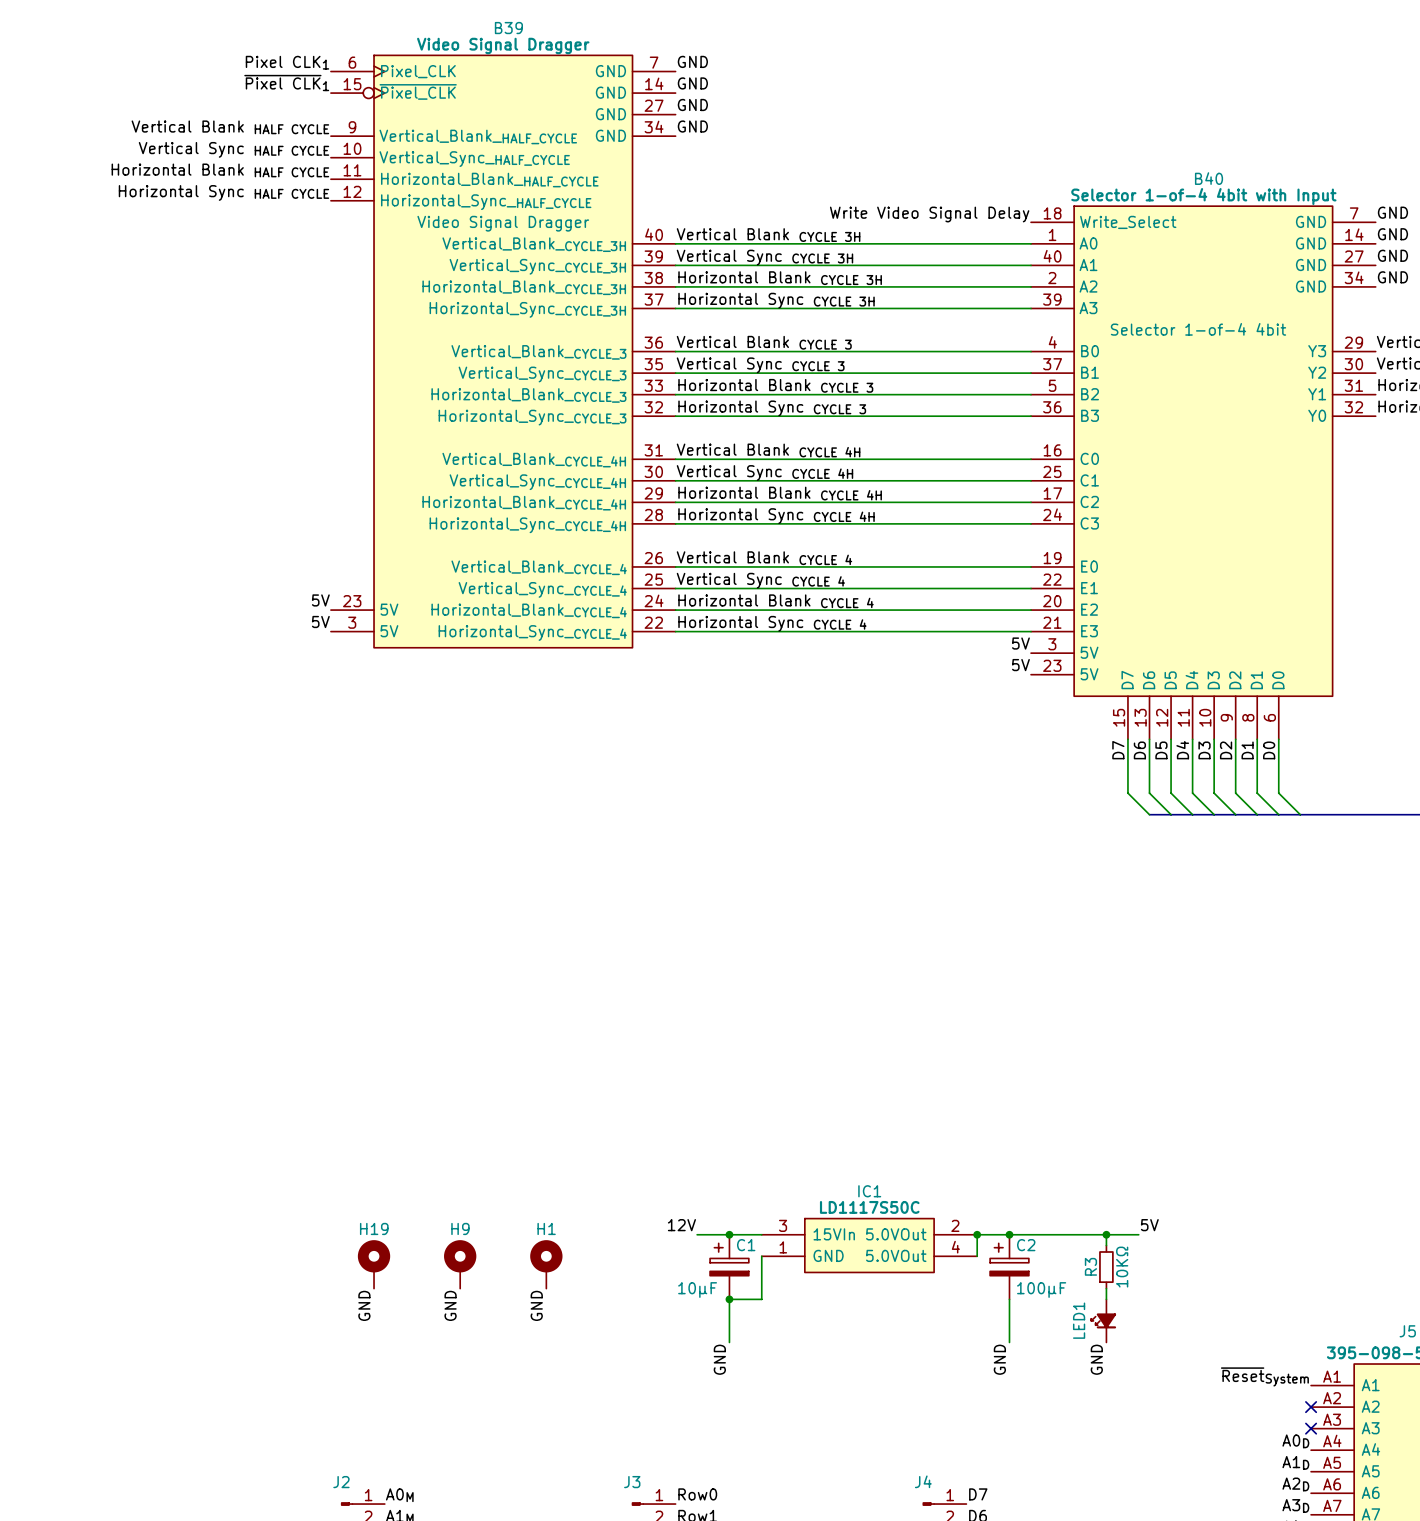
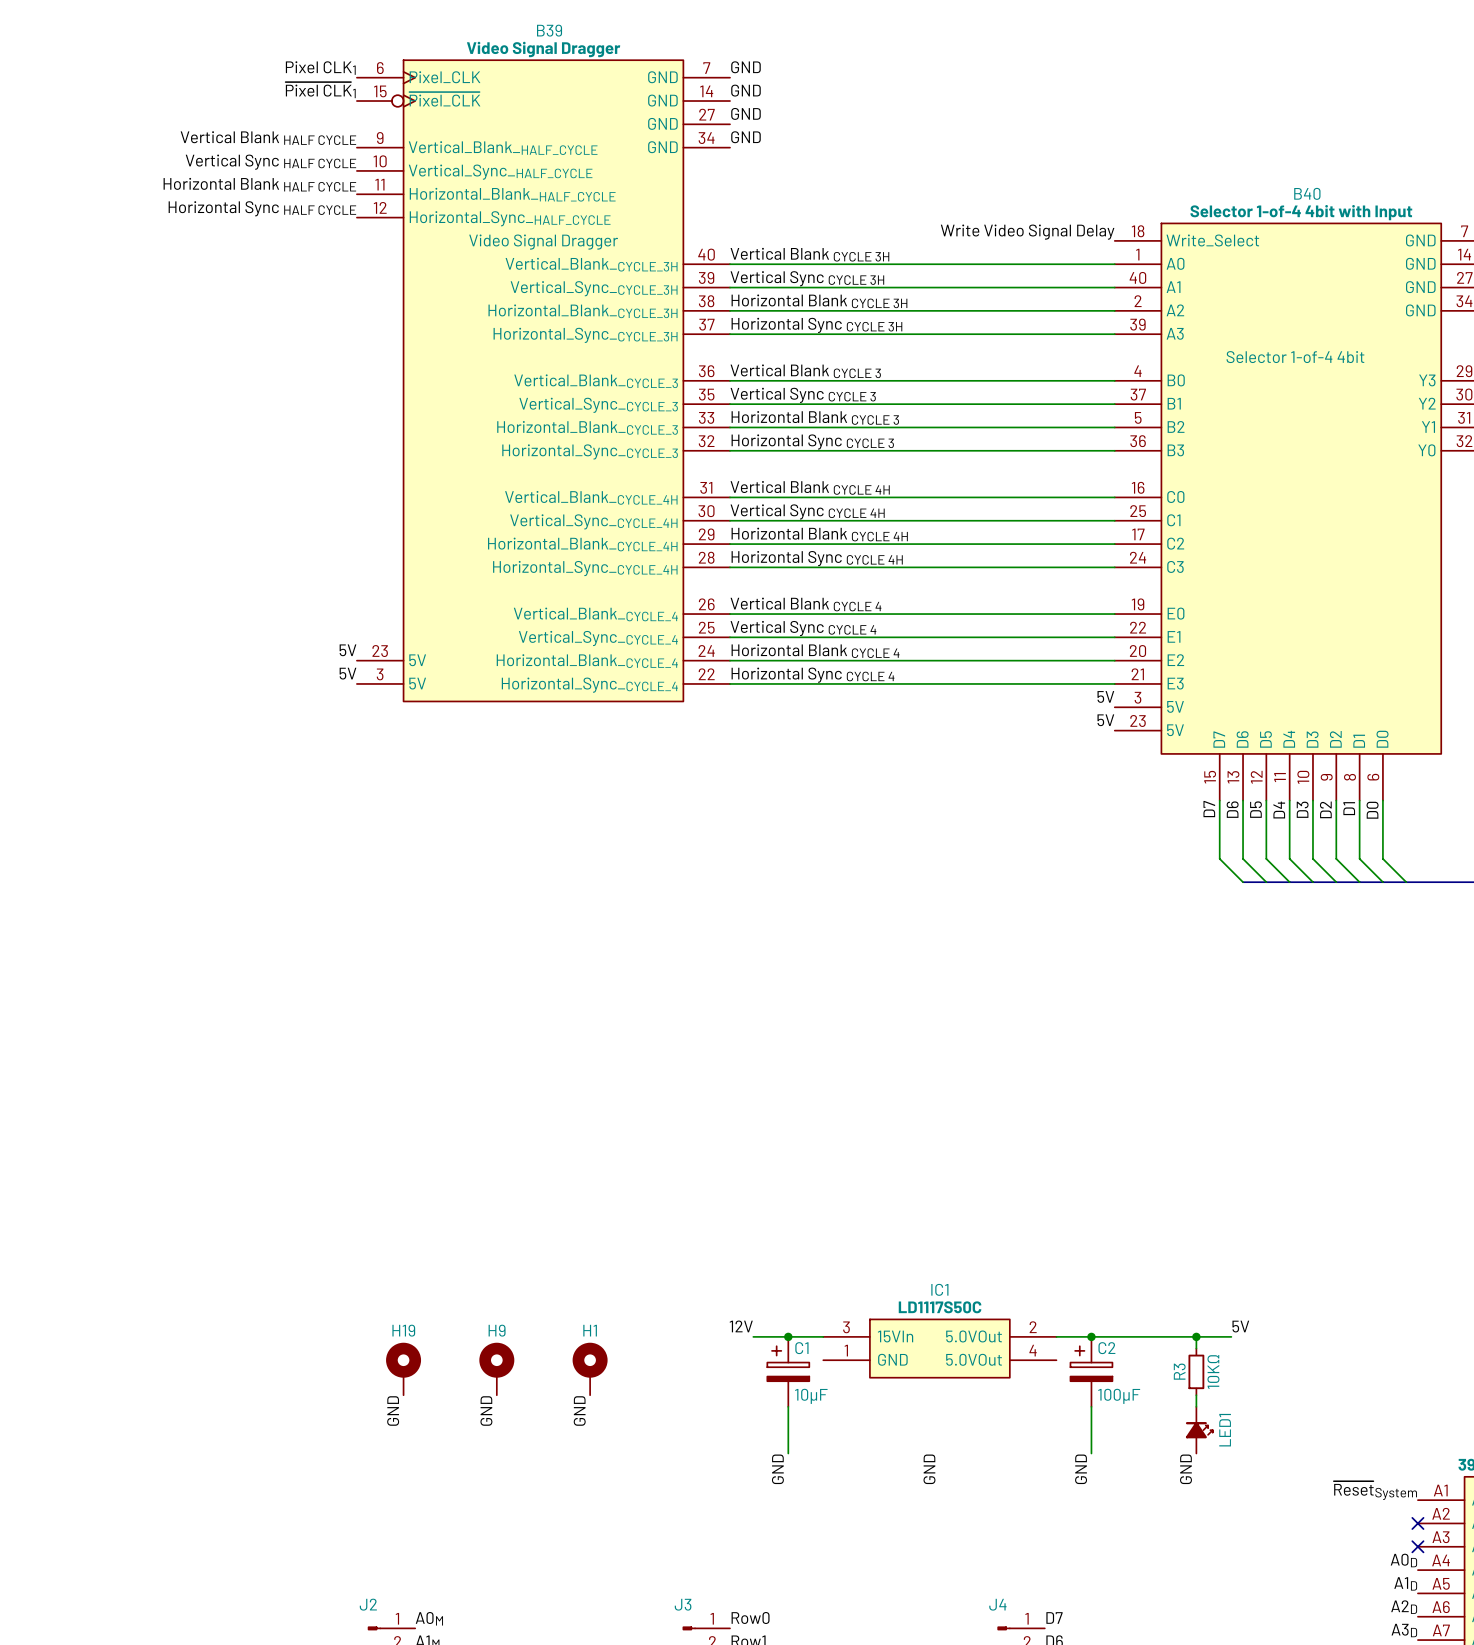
wire: (977, 1234) (977, 1256) -> none
junction: (977, 1234) -> none
wire: (761, 1256) (761, 1299) (729, 1299) -> none
C1 value position: 10μF (697, 1290) -> 10μF (811, 1396)
junction: (729, 1299) -> none
LED1 rotation: 0° (1103, 1320) -> 180° (1199, 1430)
label: none -> GND (929, 1469)

